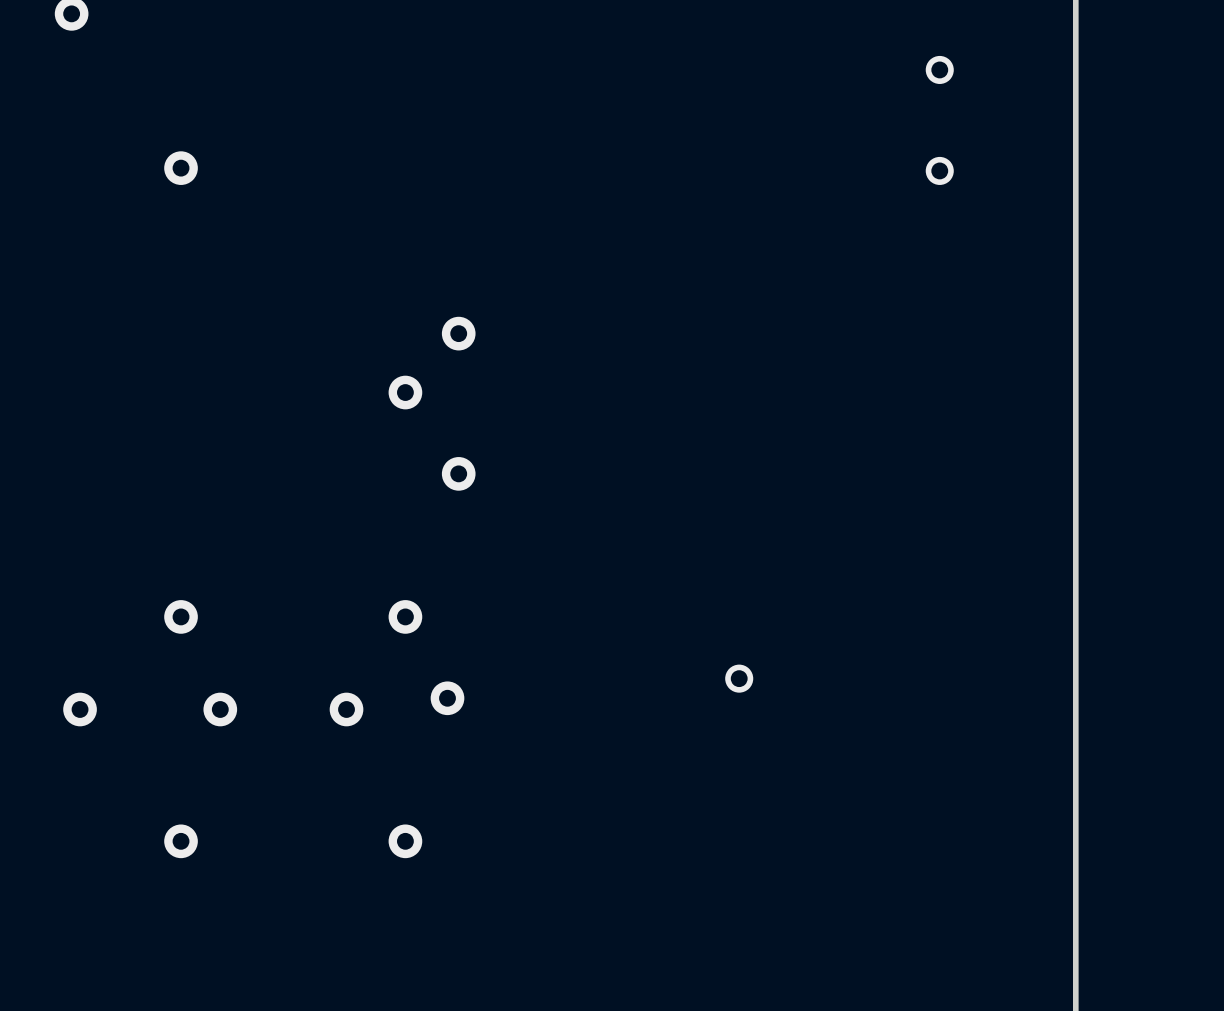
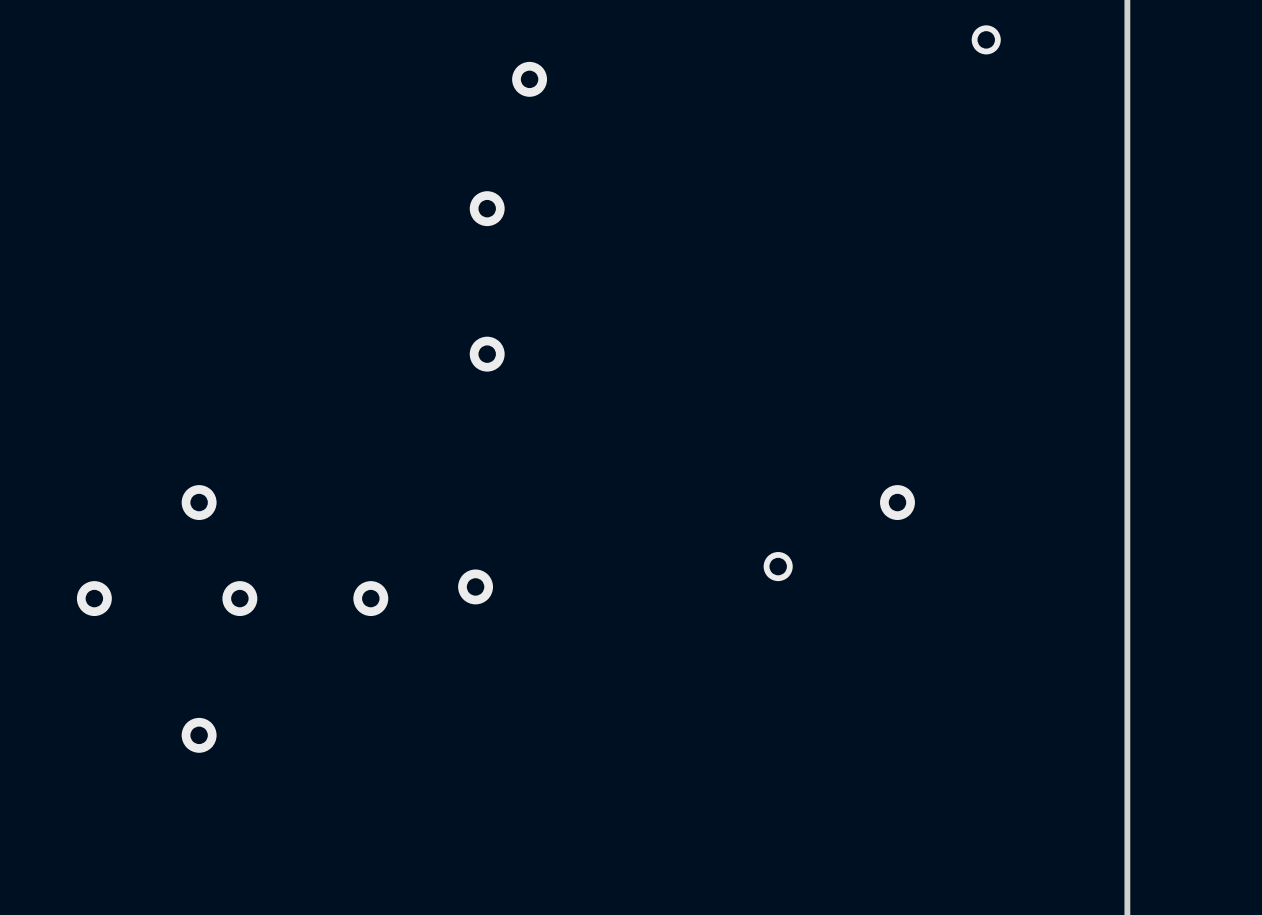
via: (181, 168) -> none
via: none -> (529, 79)
via: (405, 392) -> none
via: (405, 616) -> none
via: none -> (897, 502)
via: (405, 841) -> none

